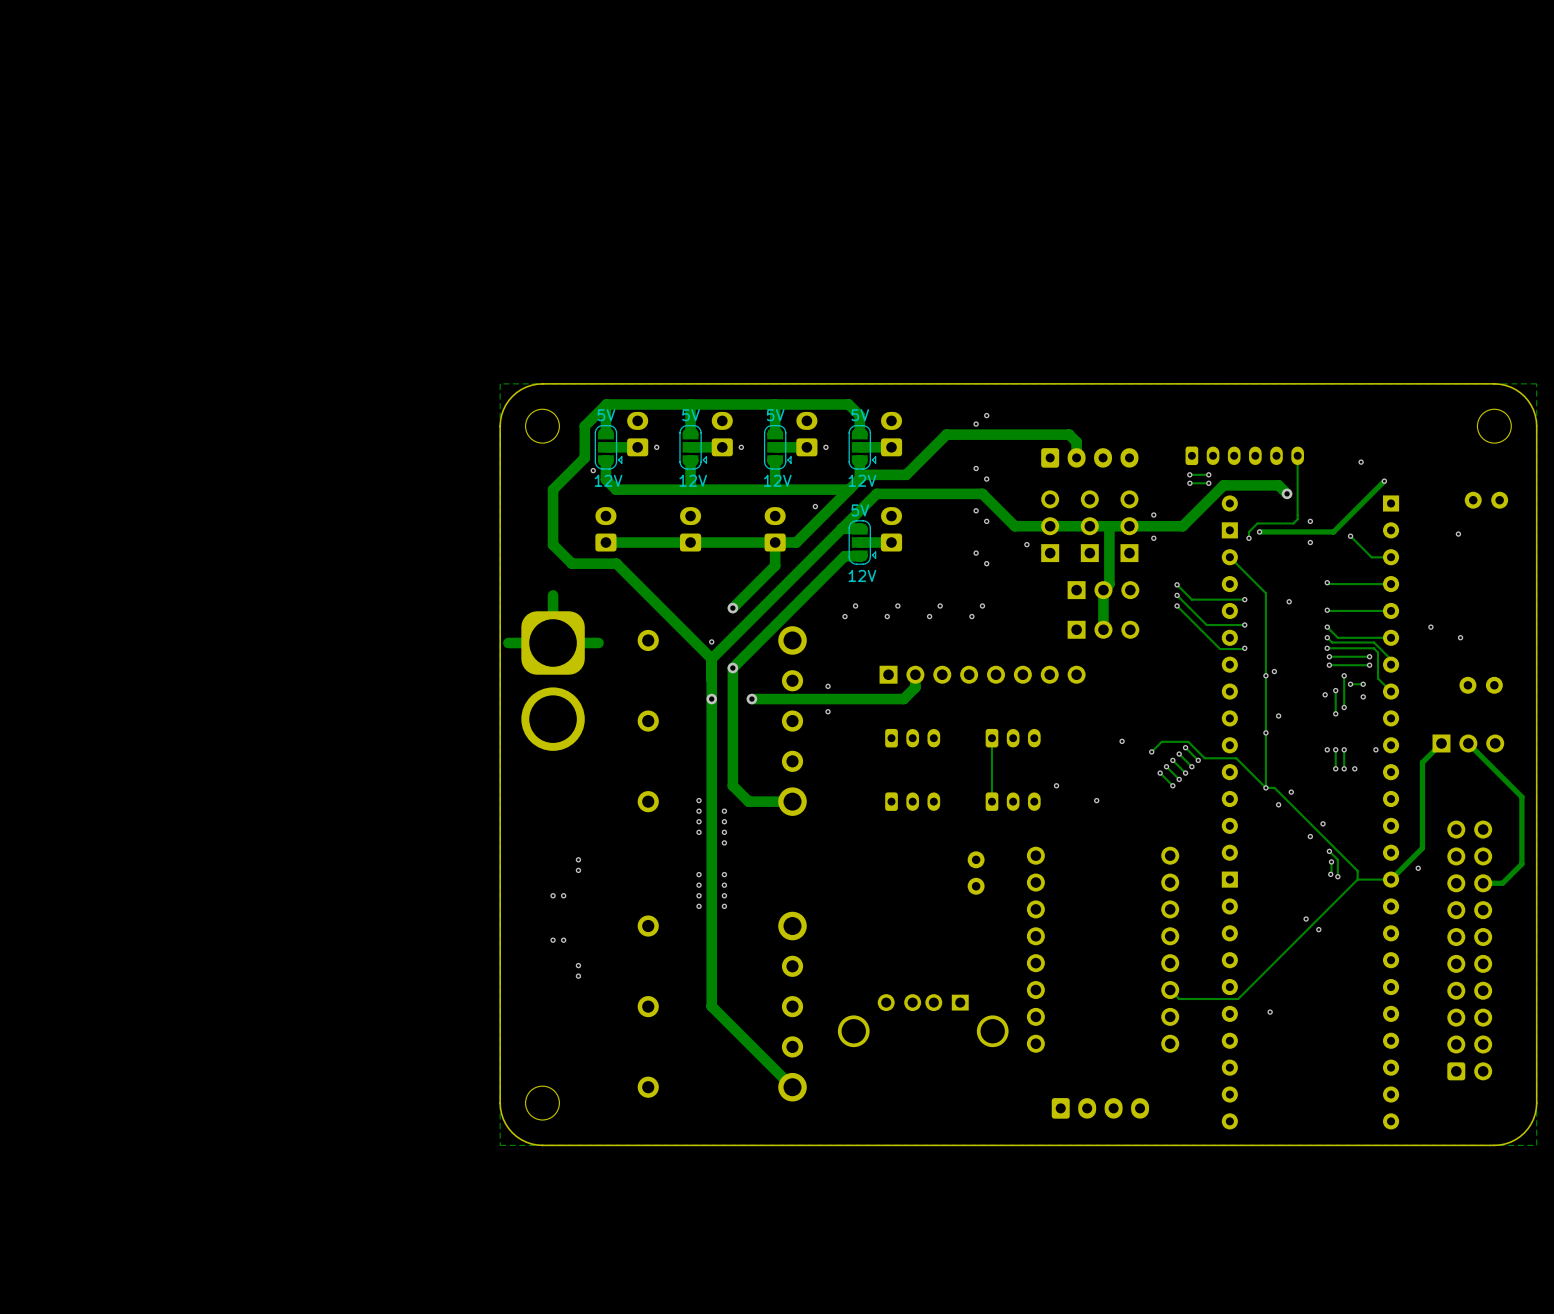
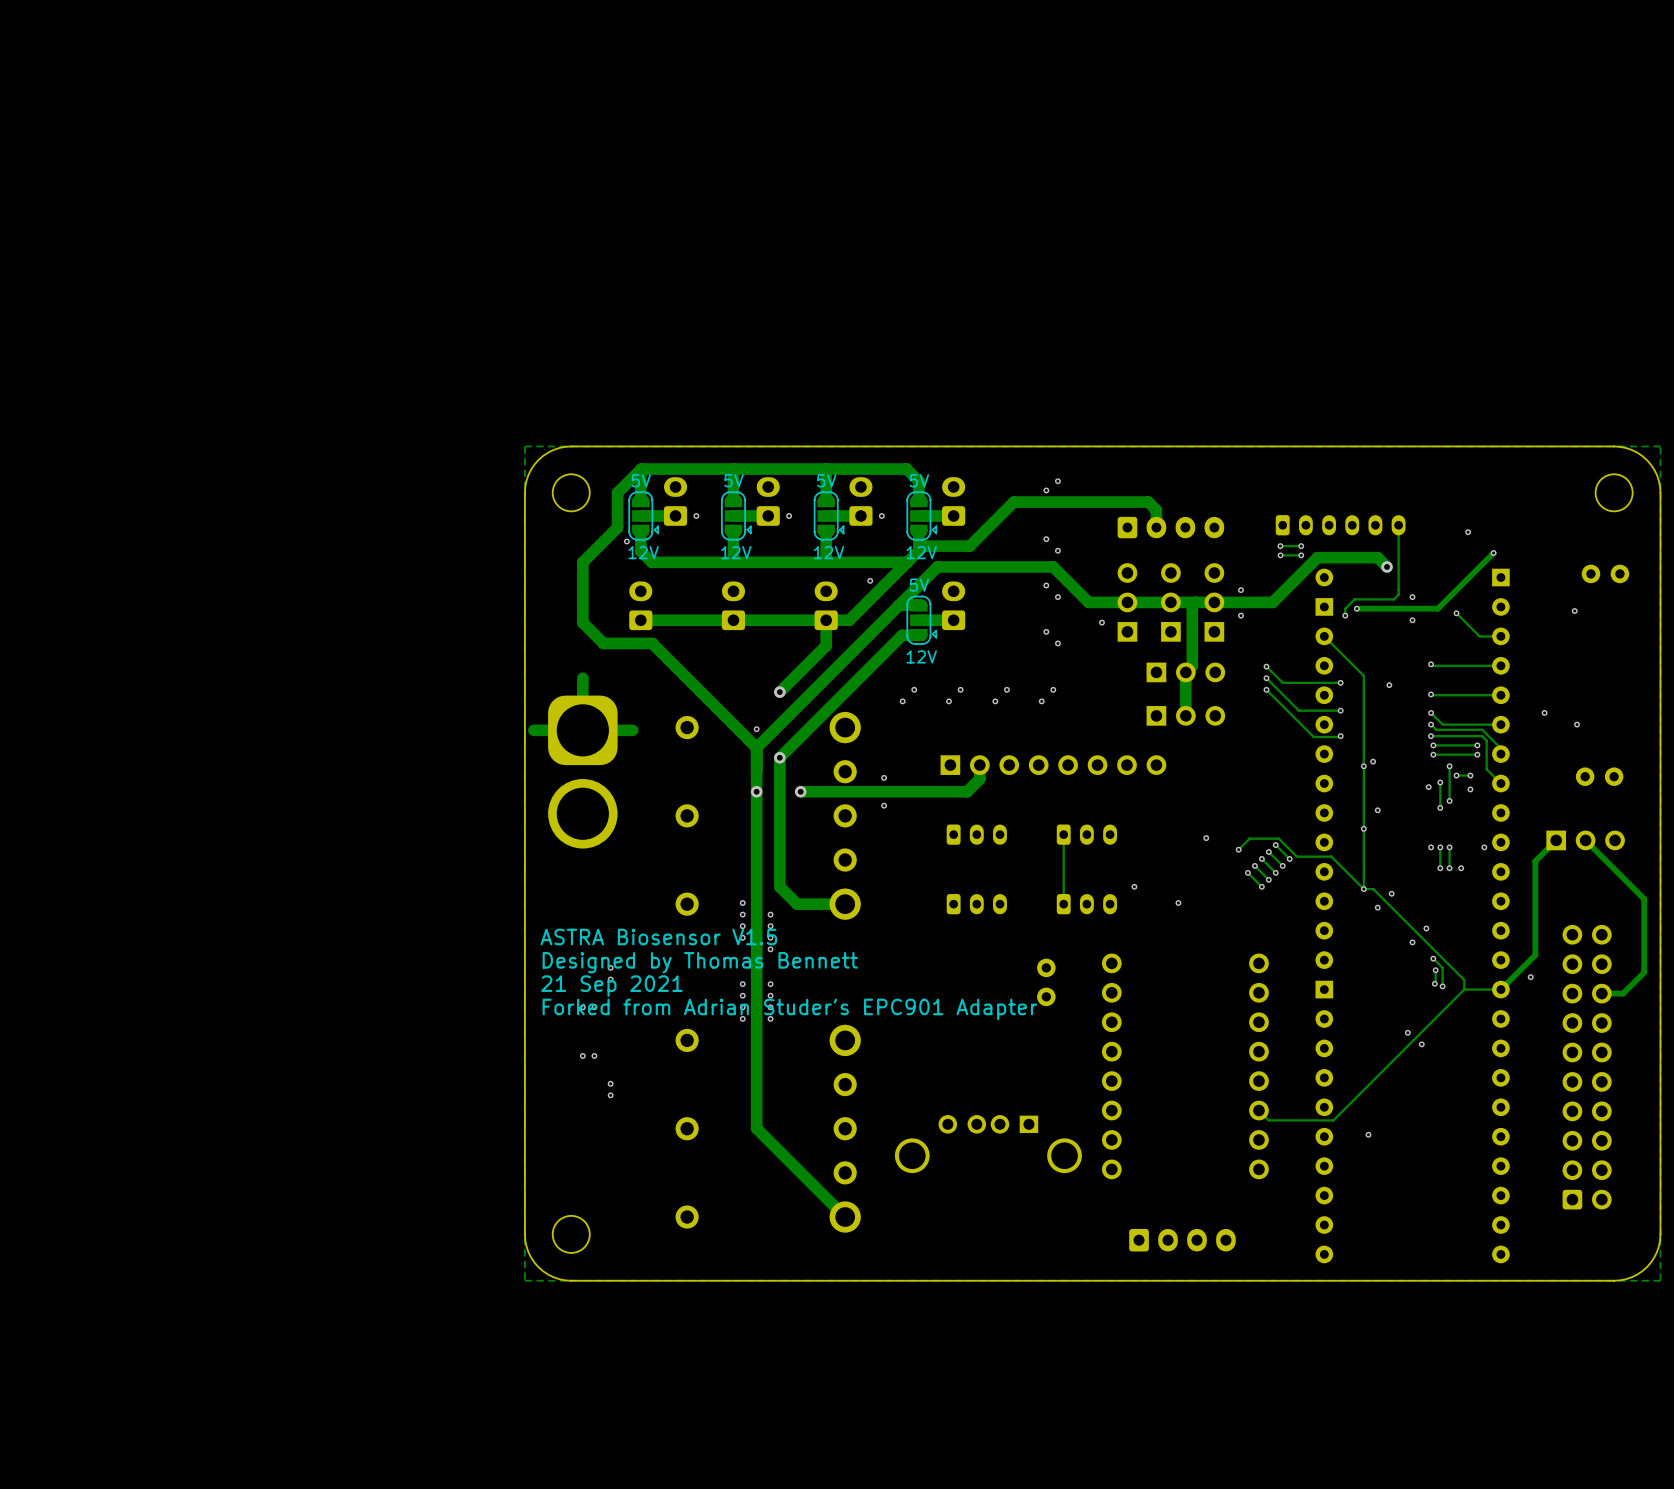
text: none -> ASTRA Biosensor V1.5 (658, 937)
text: none -> Designed by Thomas Bennett (700, 962)
text: none -> 21 Sep 2021 (611, 986)
text: none -> Forked from Adrian Studer's EPC901 Adapter (789, 1009)

